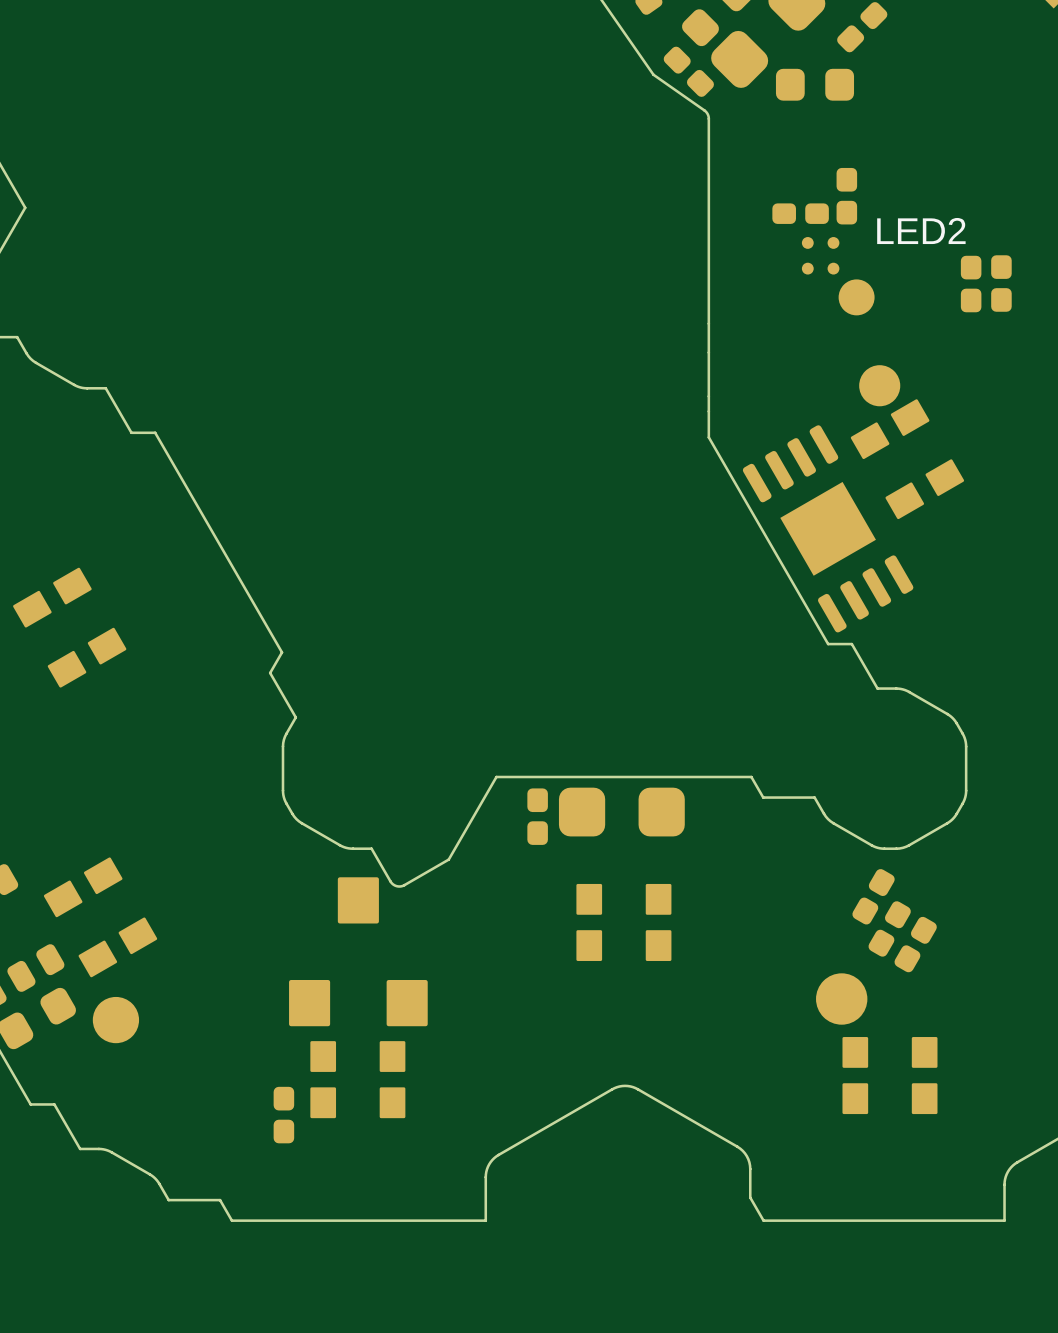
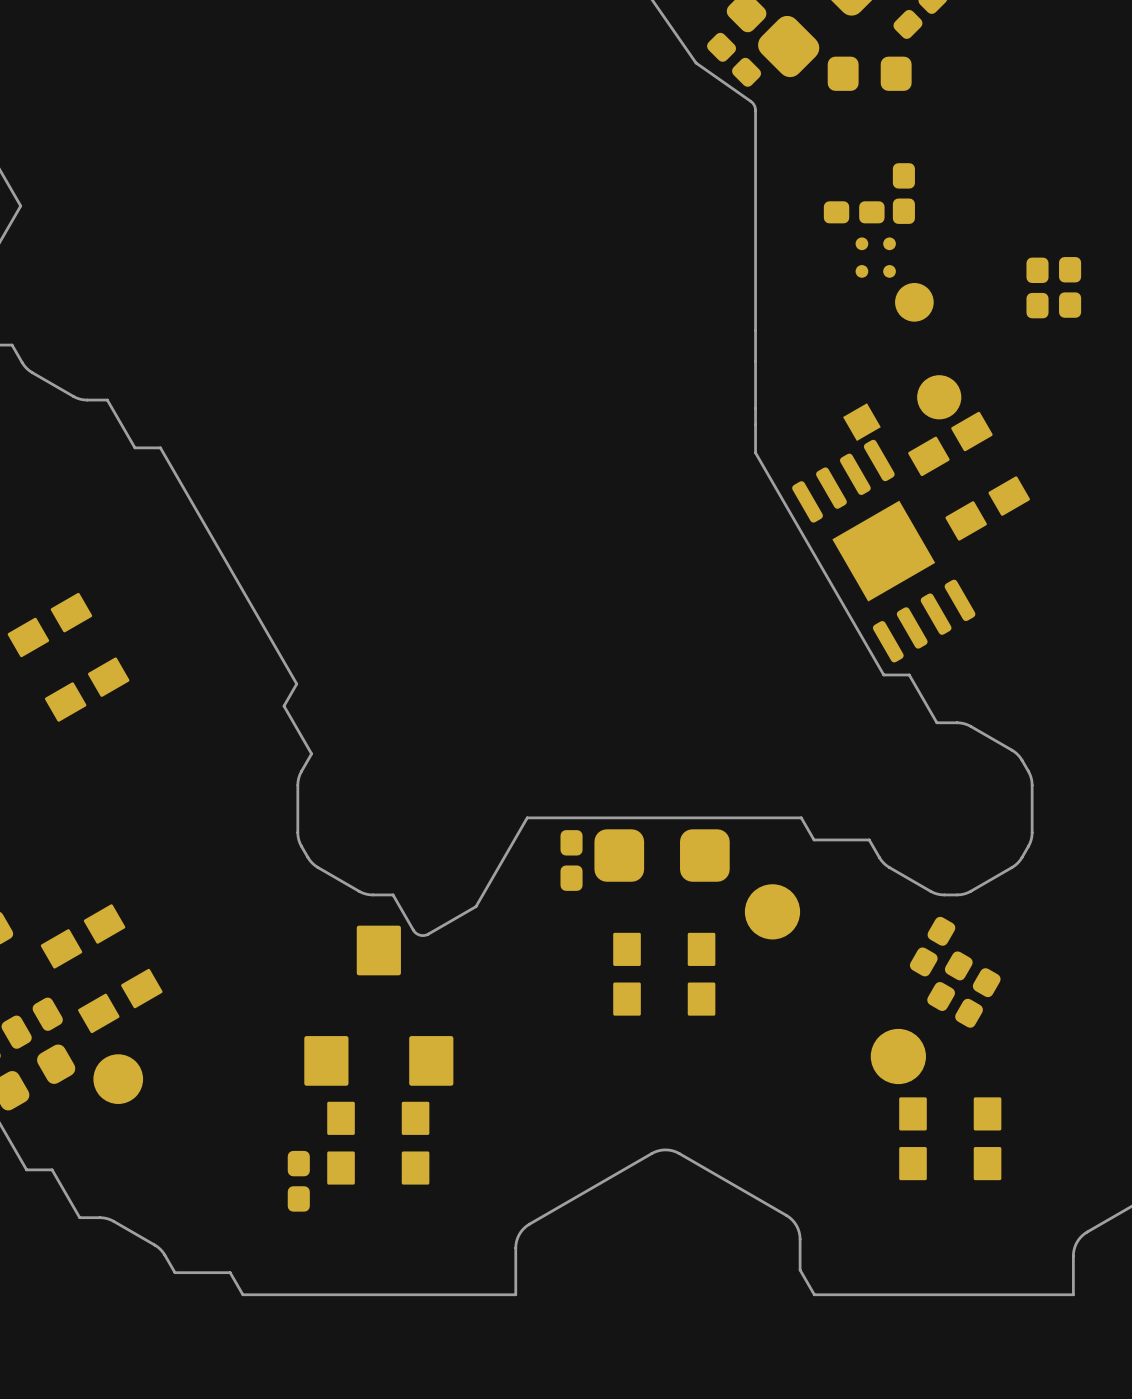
part value: LED2 (921, 231) -> none
part: none -> (861, 422)
part: none -> (772, 911)

